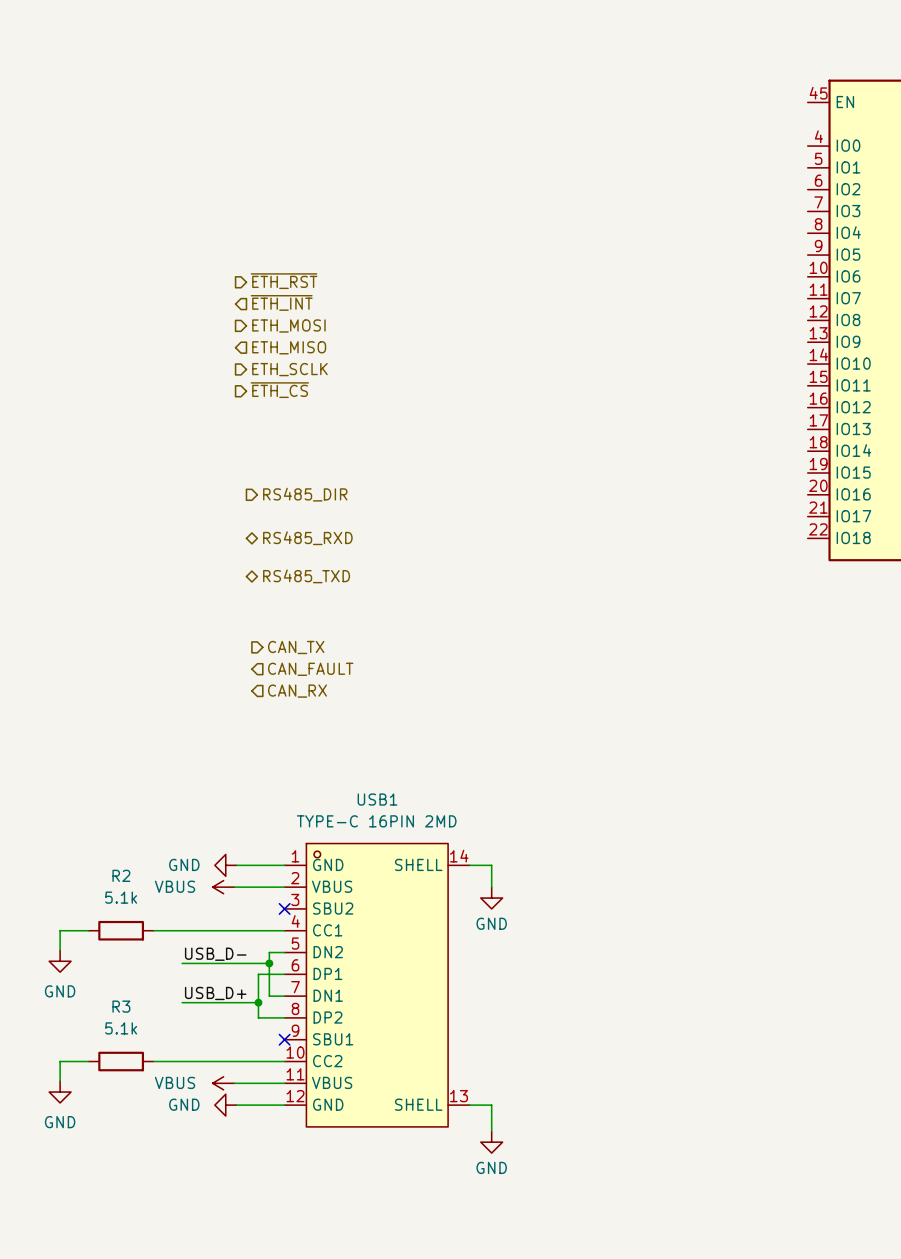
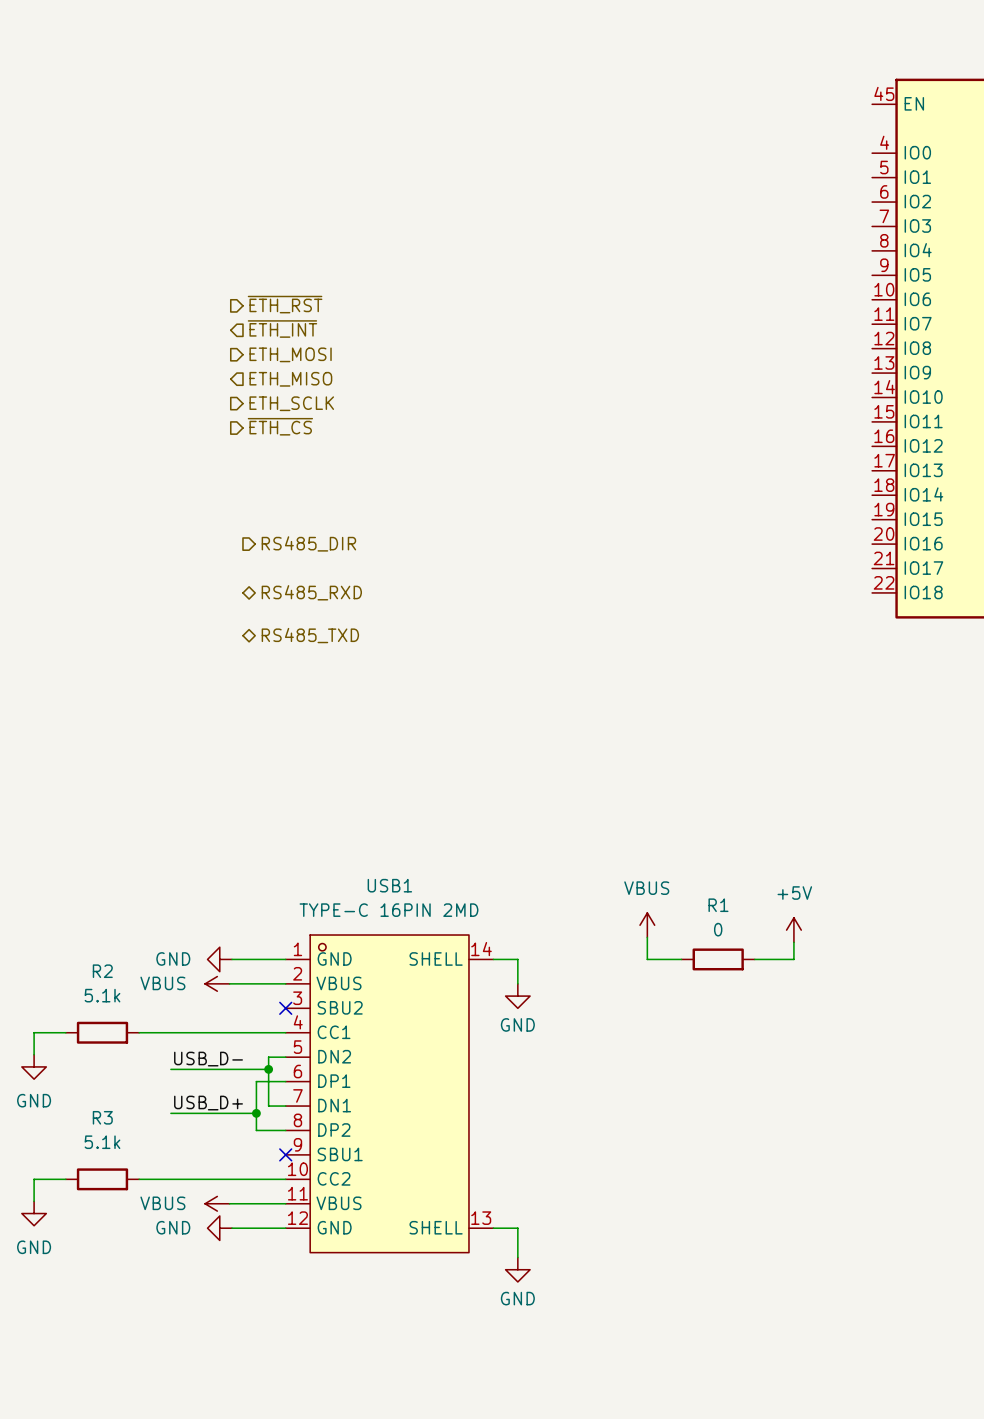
hierarchical label: CAN_TX (296, 647) -> none
hierarchical label: CAN_FAULT (310, 669) -> none
hierarchical label: CAN_RX (297, 691) -> none
power symbol: none -> VBUS (647, 925)
power symbol: none -> +5V (793, 930)
wire: none -> (647, 937) (647, 959) (681, 959)
wire: none -> (793, 942) (793, 959) (754, 959)
R1: none -> 0 (718, 959)

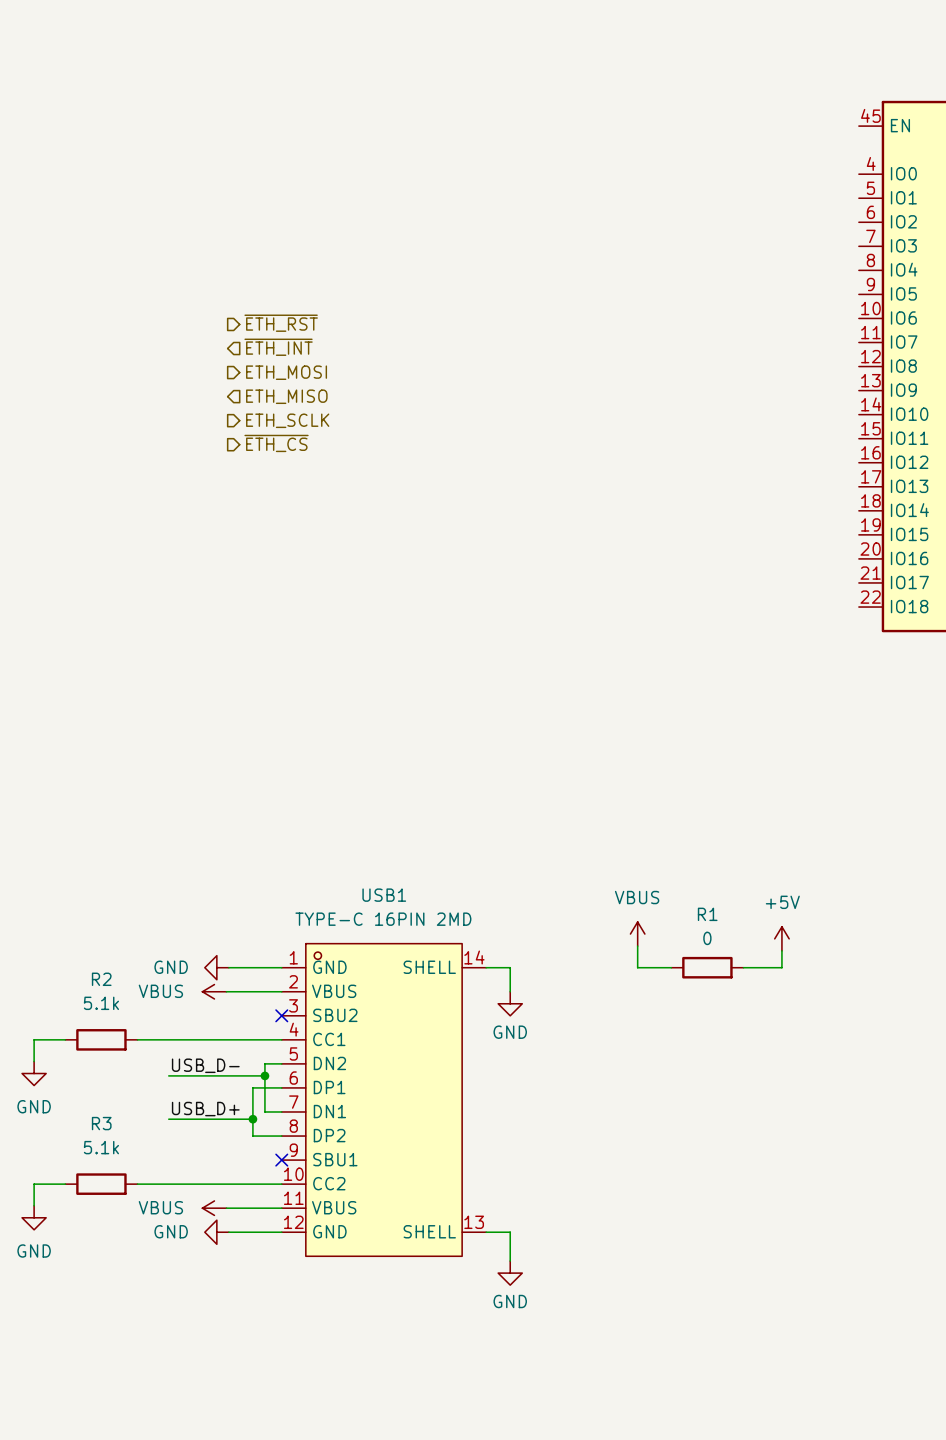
hierarchical label: RS485_DIR (308, 543) -> none
hierarchical label: RS485_RXD (311, 592) -> none
hierarchical label: RS485_TXD (310, 635) -> none

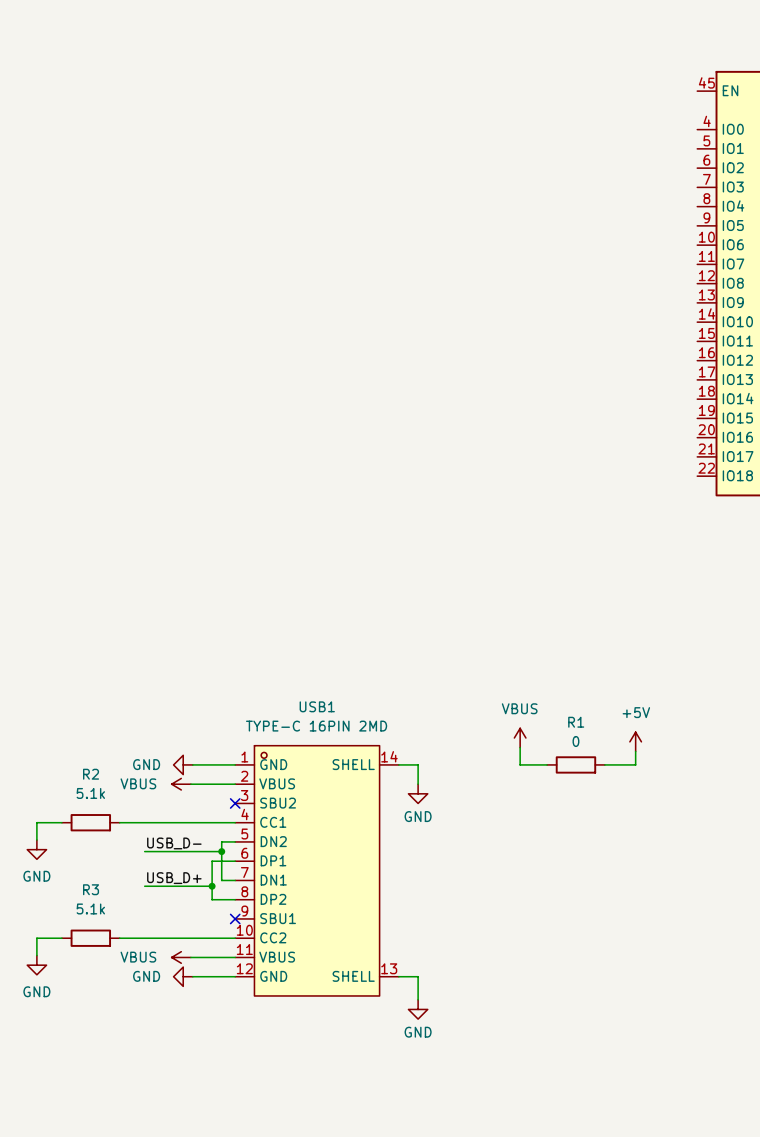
hierarchical label: ~{ETH_RST} (281, 323) -> none
hierarchical label: ~{ETH_INT} (278, 347) -> none
hierarchical label: ETH_MOSI (286, 372) -> none
hierarchical label: ETH_MISO (286, 396) -> none
hierarchical label: ETH_SCLK (287, 420) -> none
hierarchical label: ~{ETH_CS} (276, 443) -> none

